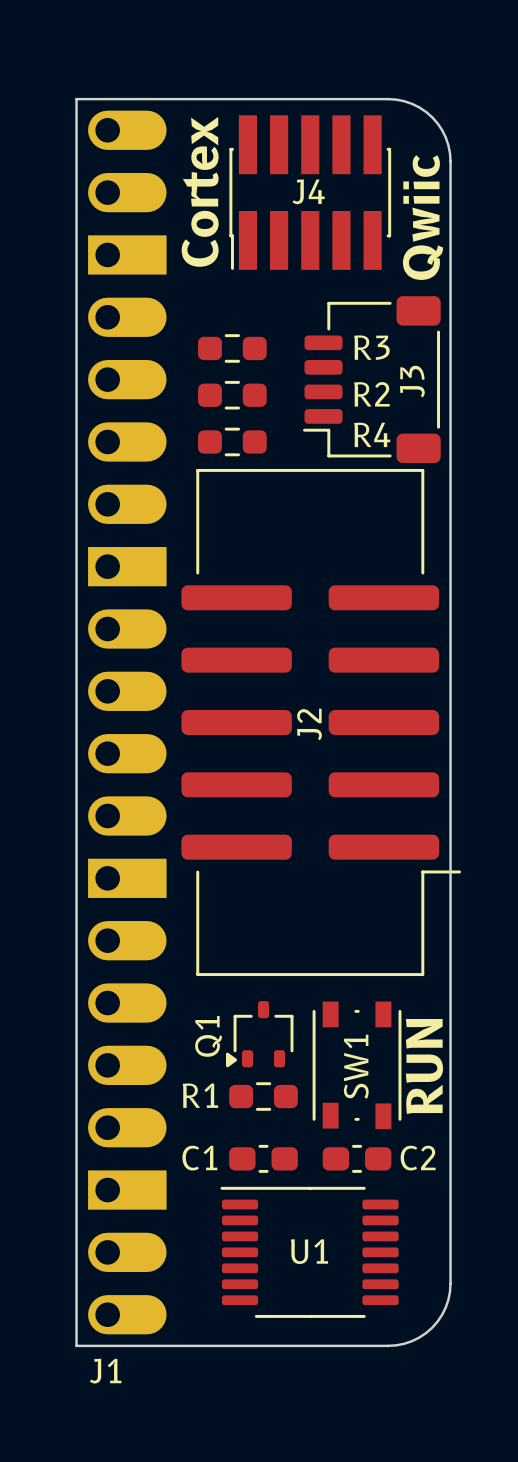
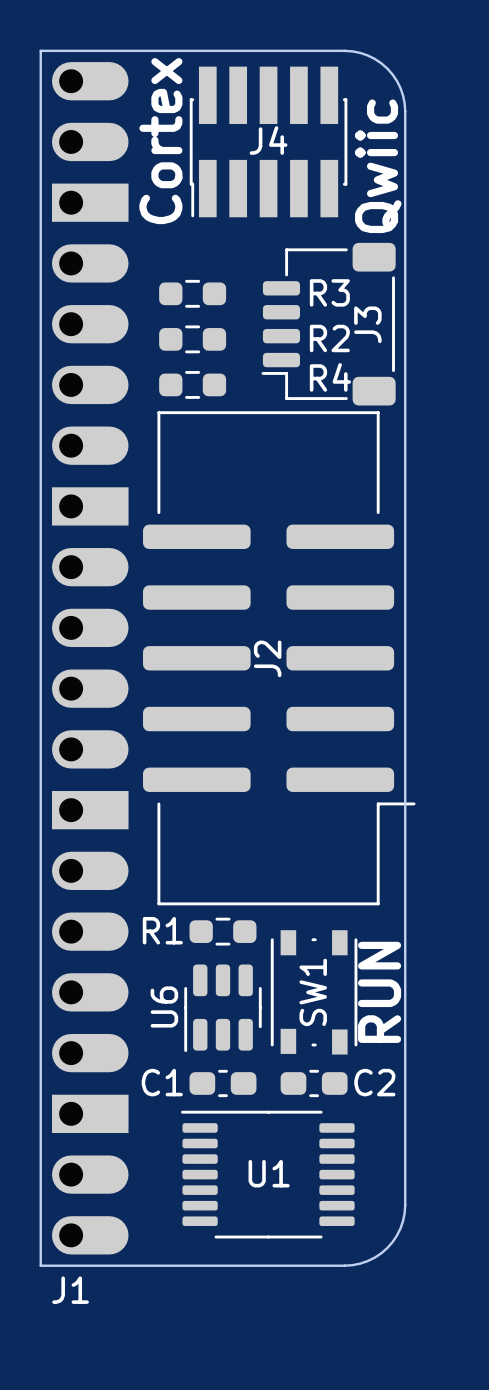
Q1: (259, 1034) -> none
U6: none -> (222, 1008)
R1 position: (263, 1096) -> (222, 931)

